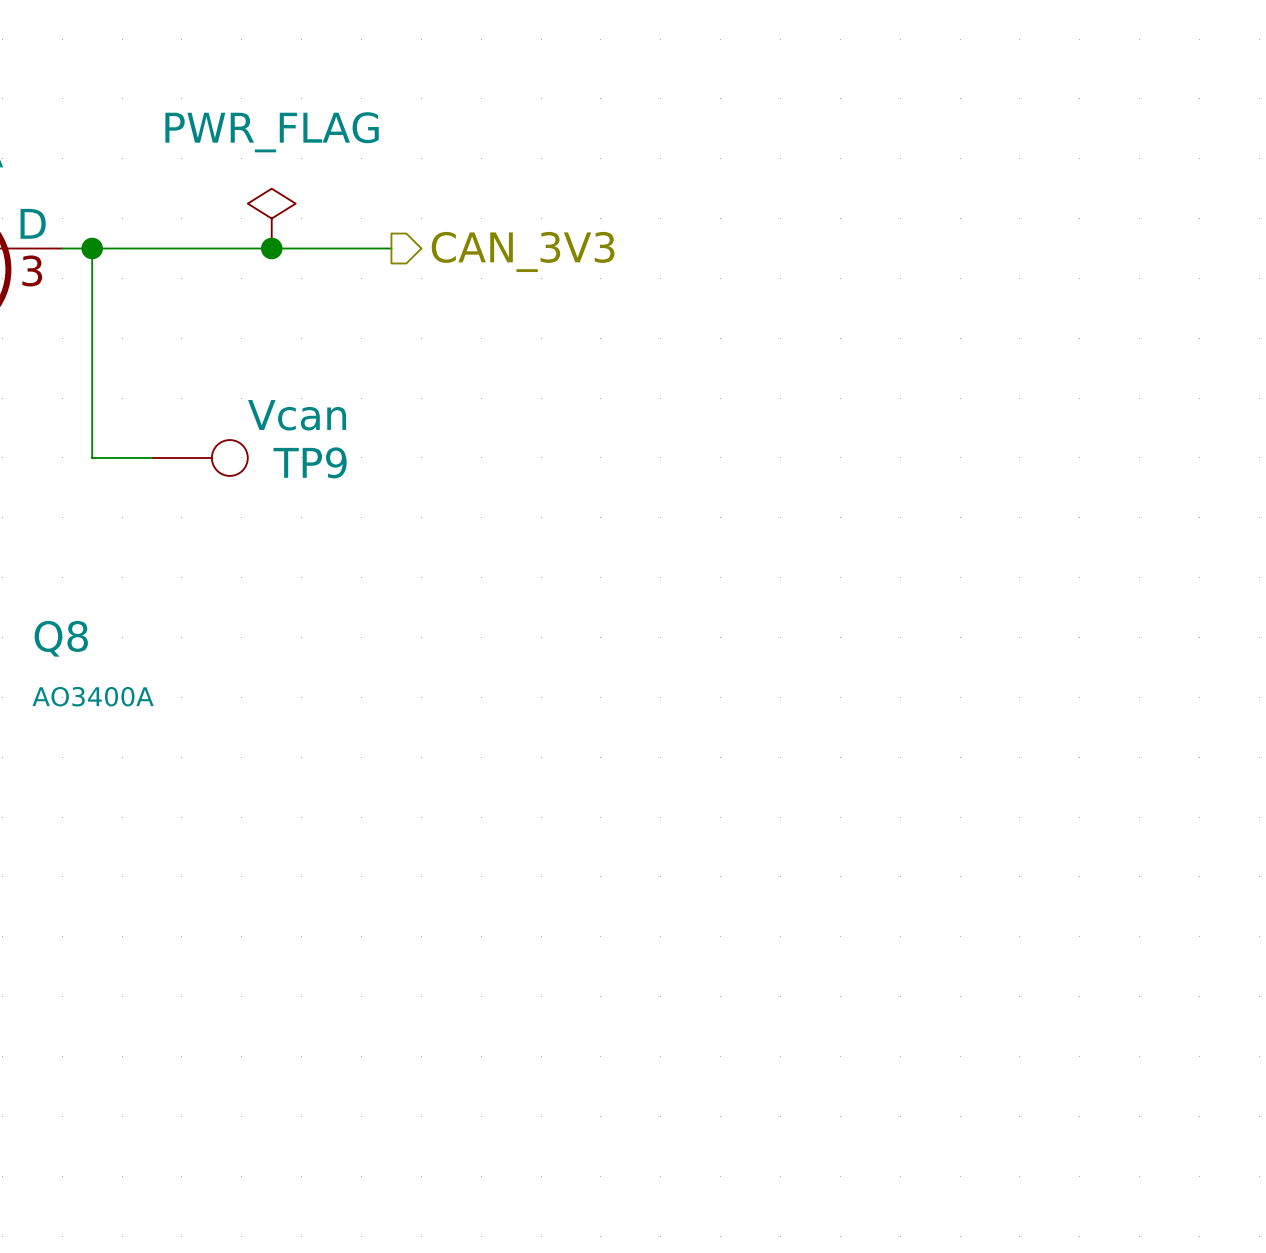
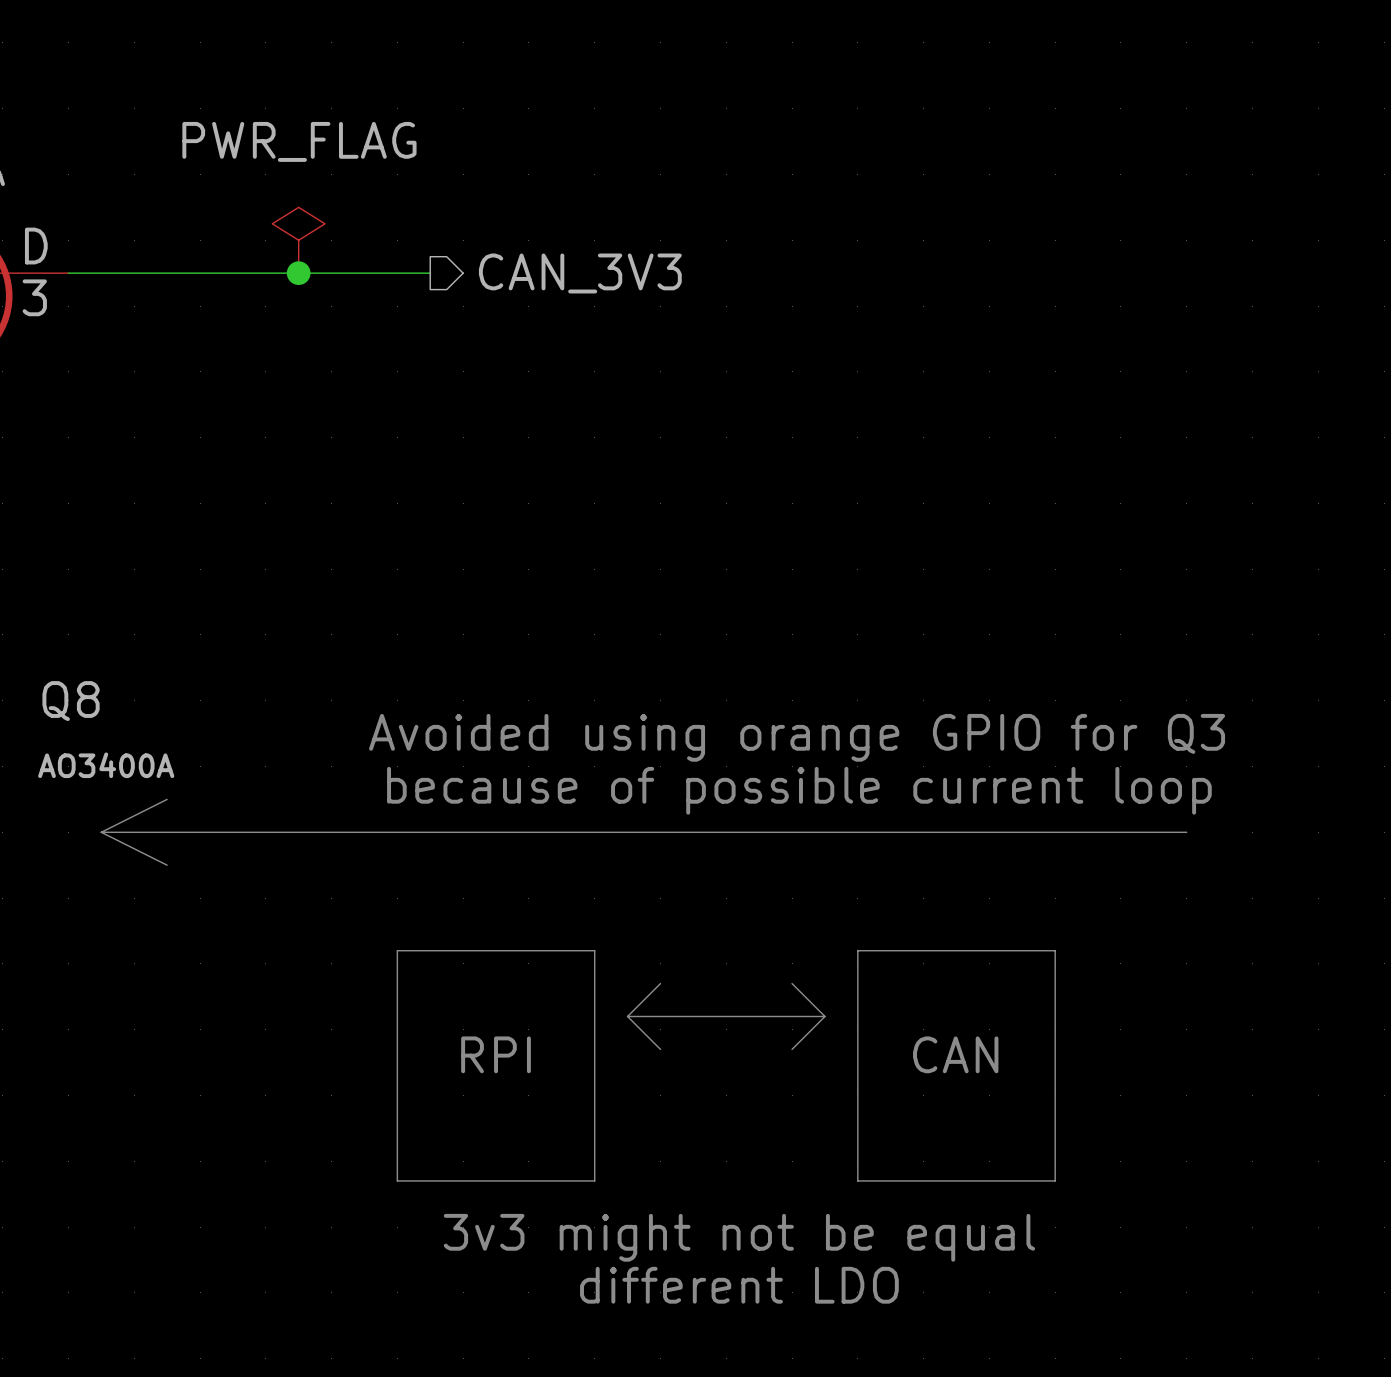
wire: (92, 248) (92, 457) (152, 457) -> none
junction: (92, 248) -> none
TP9: Vcan (199, 457) -> none
text: none -> Avoided using orange GPIO for Q3 (797, 737)
text: none -> because of possible current loop (799, 790)
line: none -> (167, 799) (101, 832)
line: none -> (101, 832) (167, 865)
line: none -> (101, 832) (1186, 832)
line: none -> (397, 950) (594, 950) (594, 1180) (397, 1180) (397, 950)
line: none -> (857, 950) (1055, 950) (1055, 1180) (857, 1180) (857, 950)
line: none -> (660, 983) (627, 1016)
line: none -> (792, 983) (824, 1016)
line: none -> (627, 1016) (824, 1016)
line: none -> (627, 1016) (660, 1049)
line: none -> (824, 1016) (792, 1049)
text: none -> RPI (496, 1054)
text: none -> CAN (955, 1054)
text: none -> 3v3 might not be equal (739, 1237)
text: none -> different LDO (739, 1285)

